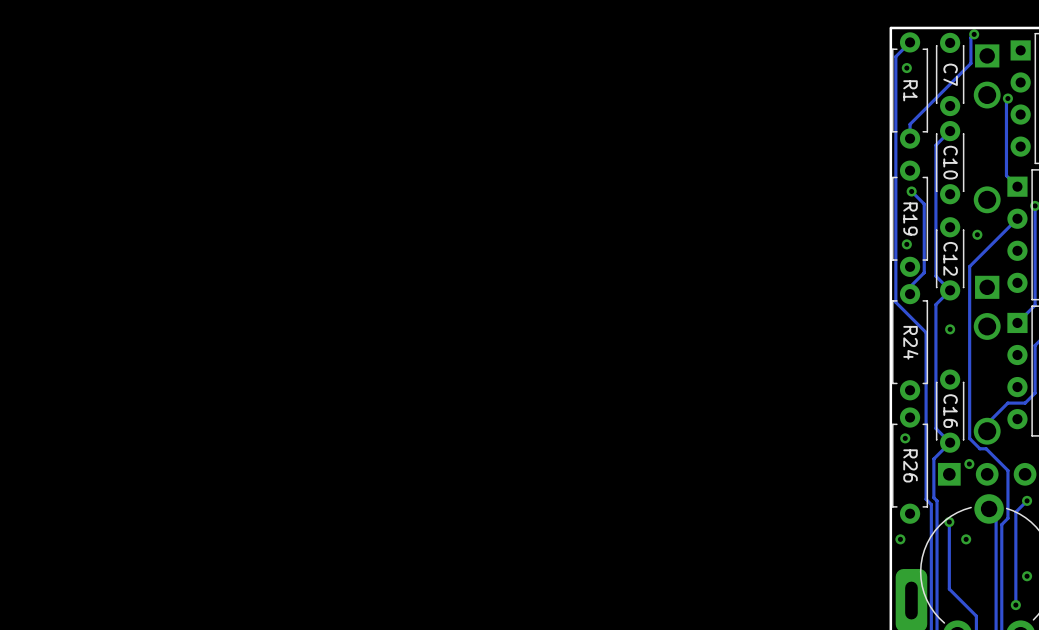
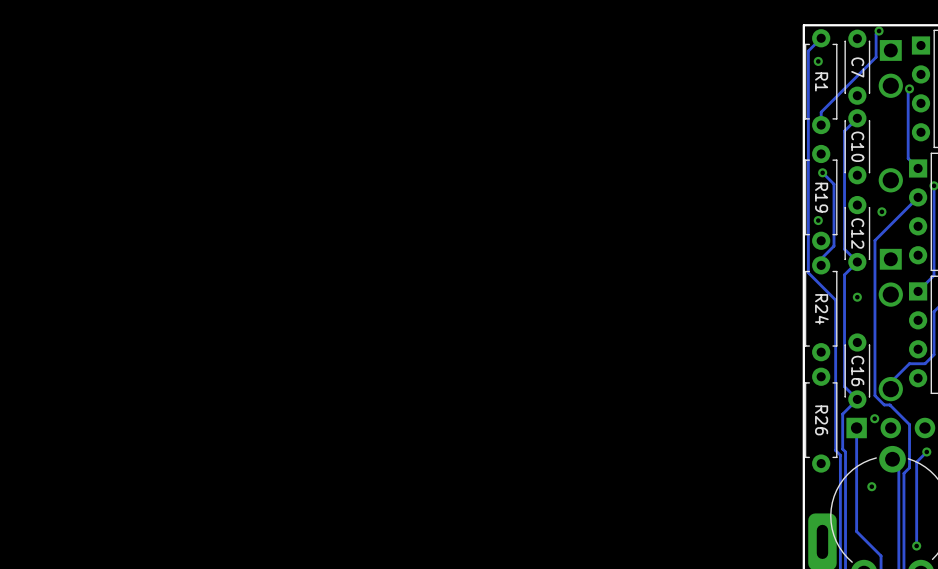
via: (905, 438) -> none
track: none -> (856, 428) (856, 471)
via: (949, 522) -> none
via: (900, 539) -> none
via: (1027, 576) -> none

